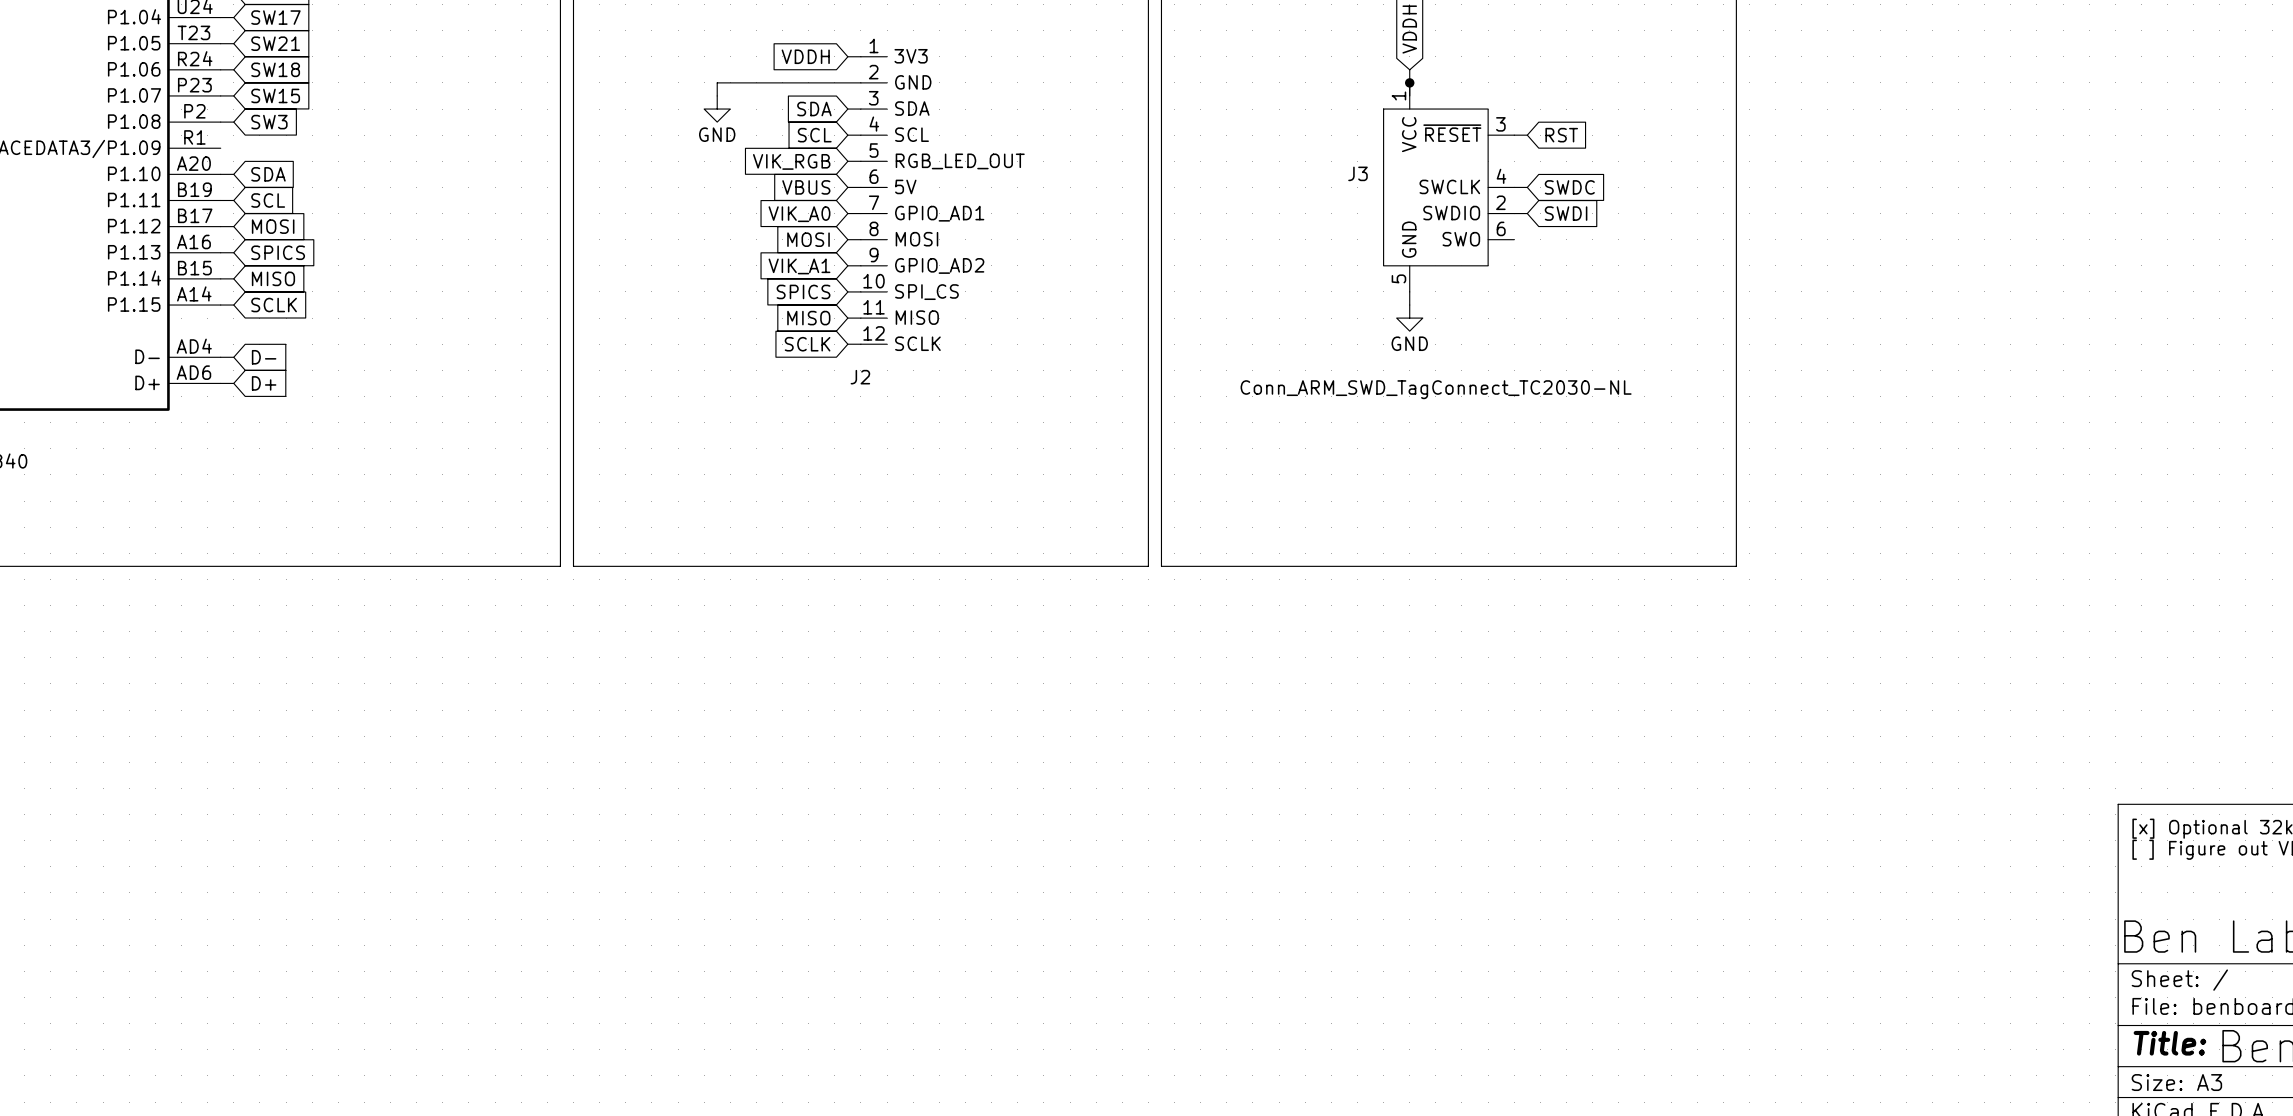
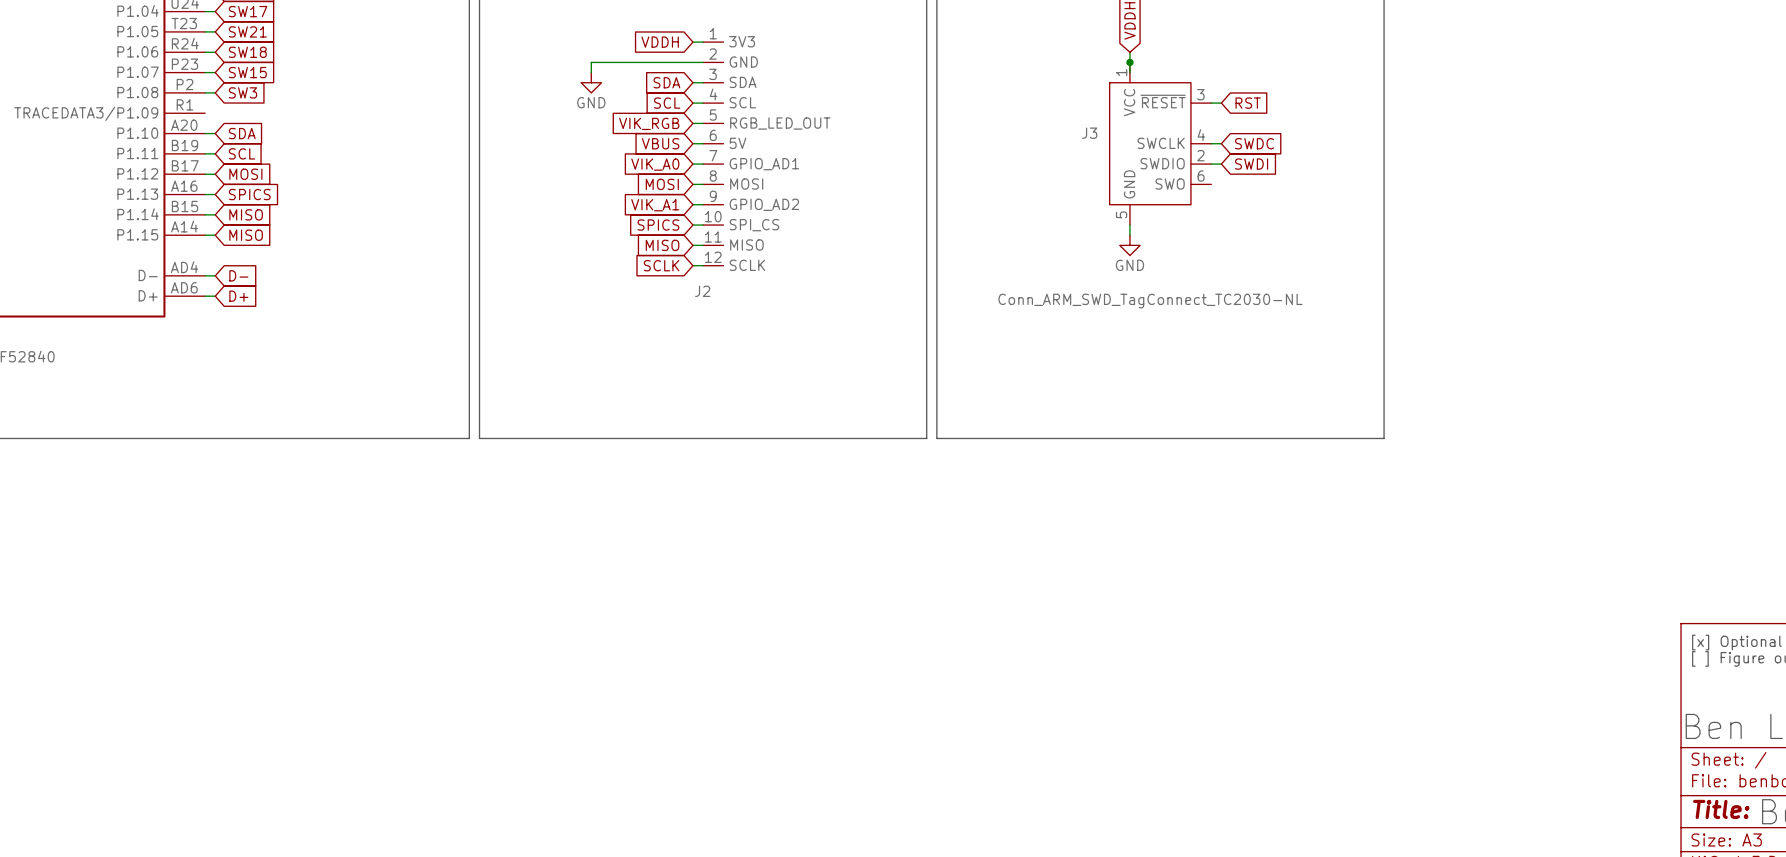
global label: SCLK (274, 305) -> MISO (246, 235)

